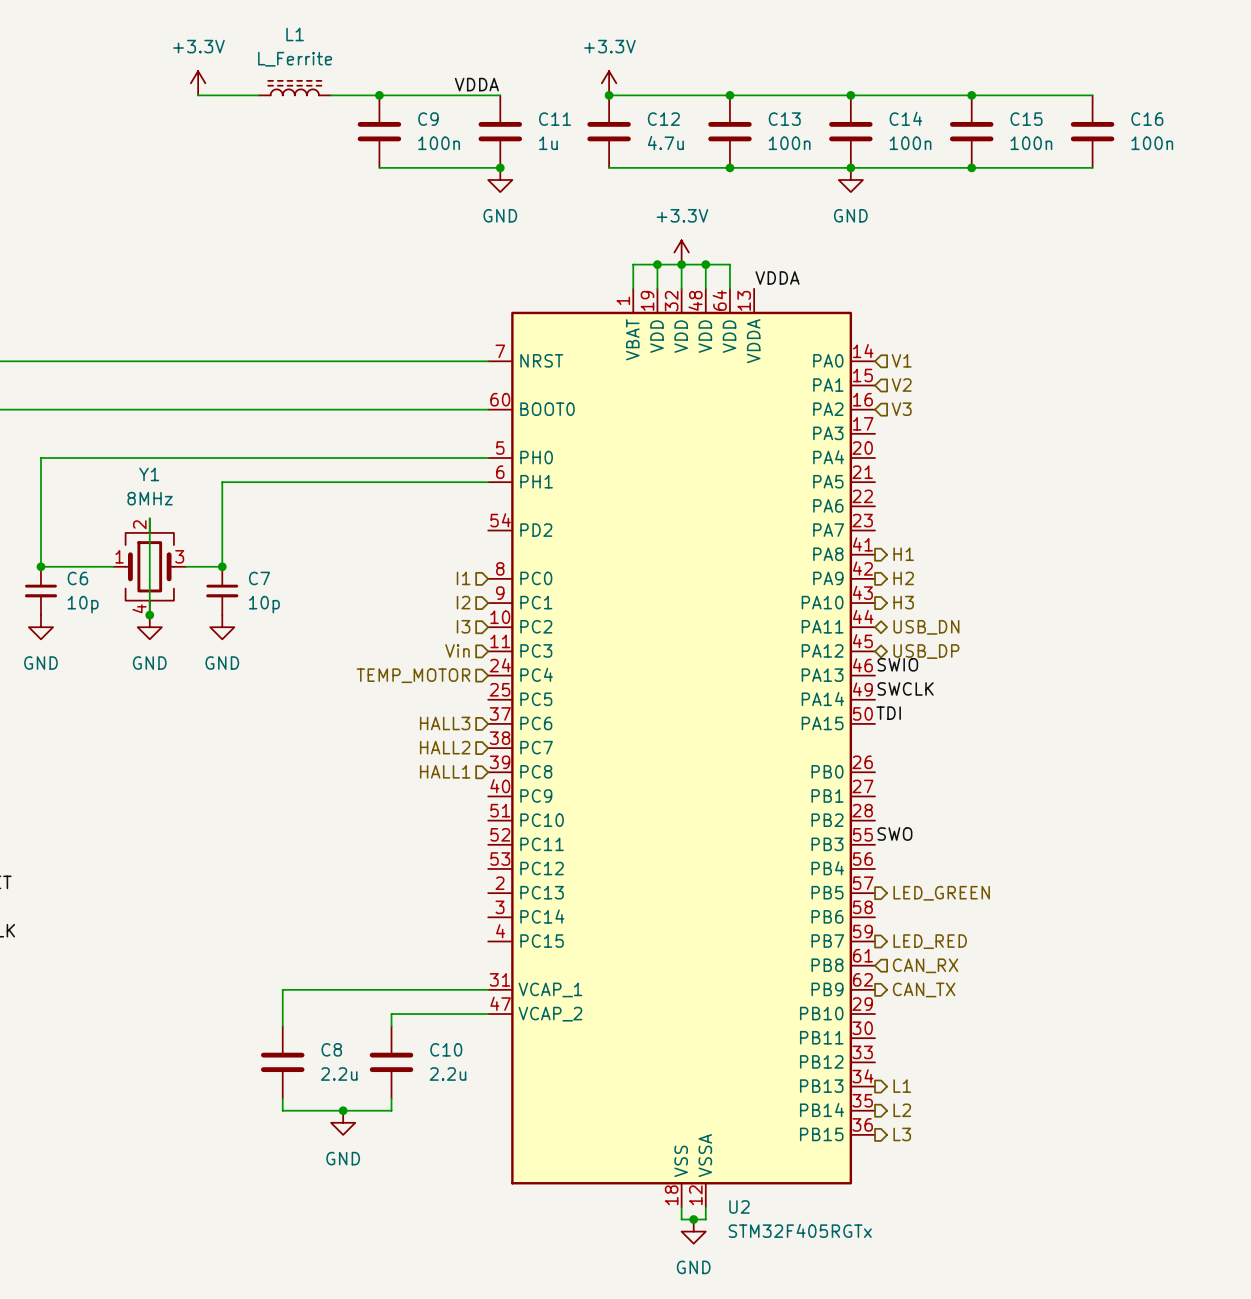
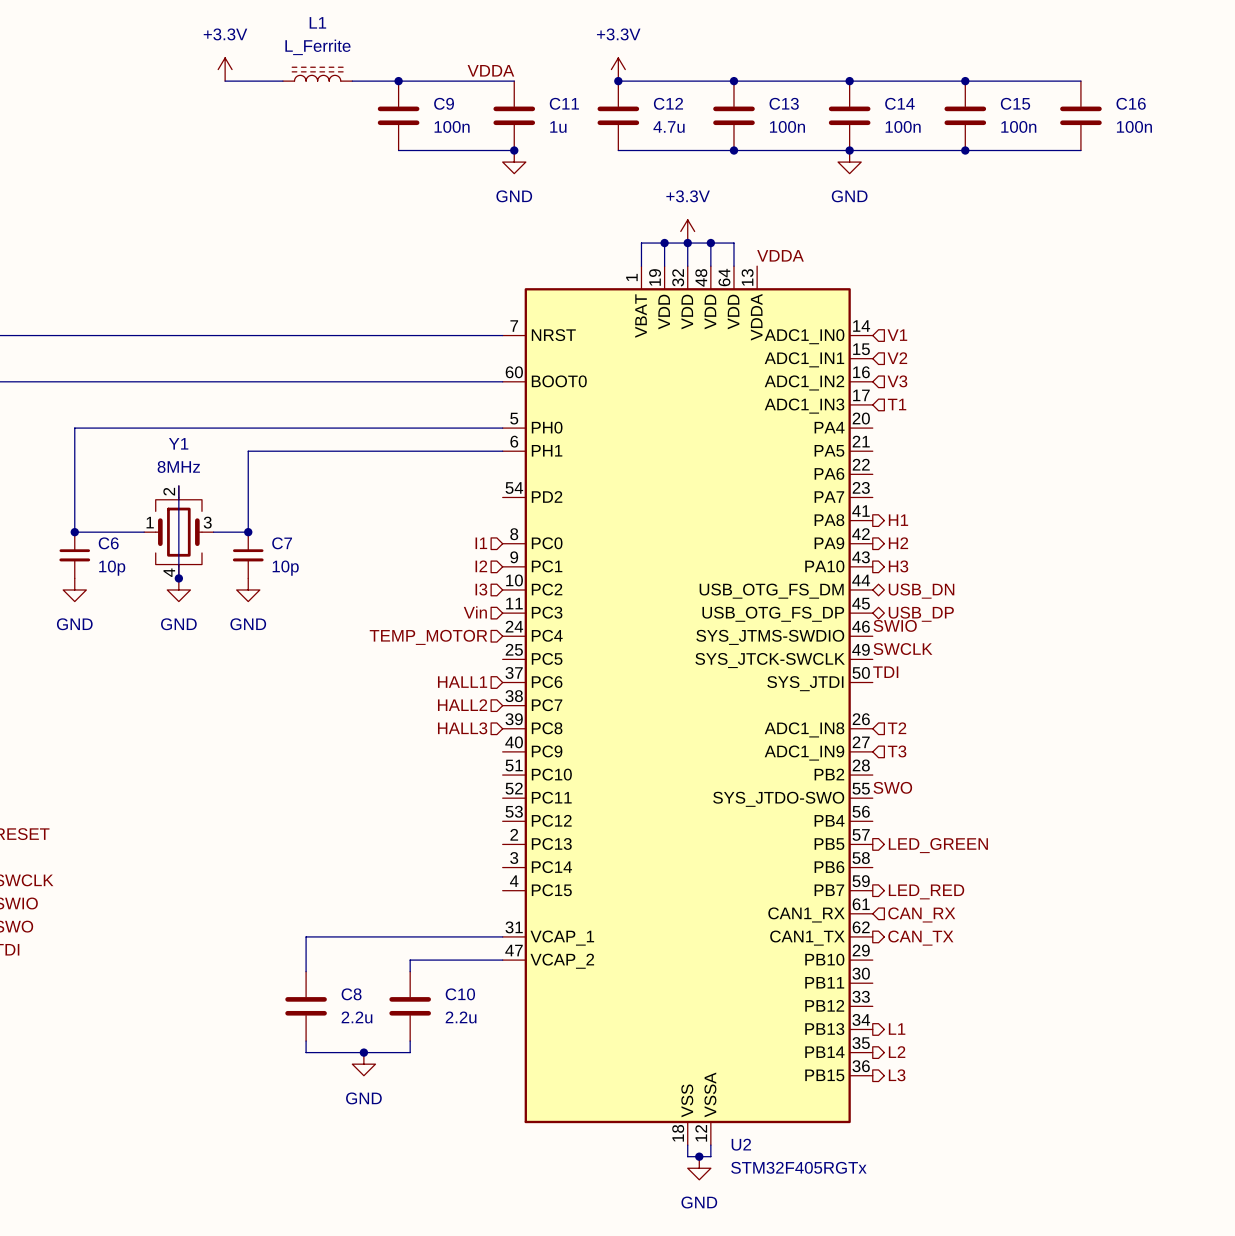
U2 symbol: [488, 288, 876, 1208] -> [502, 266, 873, 1146]
hierarchical label: none -> T1 (897, 404)
hierarchical label: HALL3 (445, 723) -> HALL1 (462, 682)
hierarchical label: HALL1 (445, 771) -> HALL3 (462, 728)
hierarchical label: none -> T2 (897, 728)
hierarchical label: none -> T3 (897, 751)

